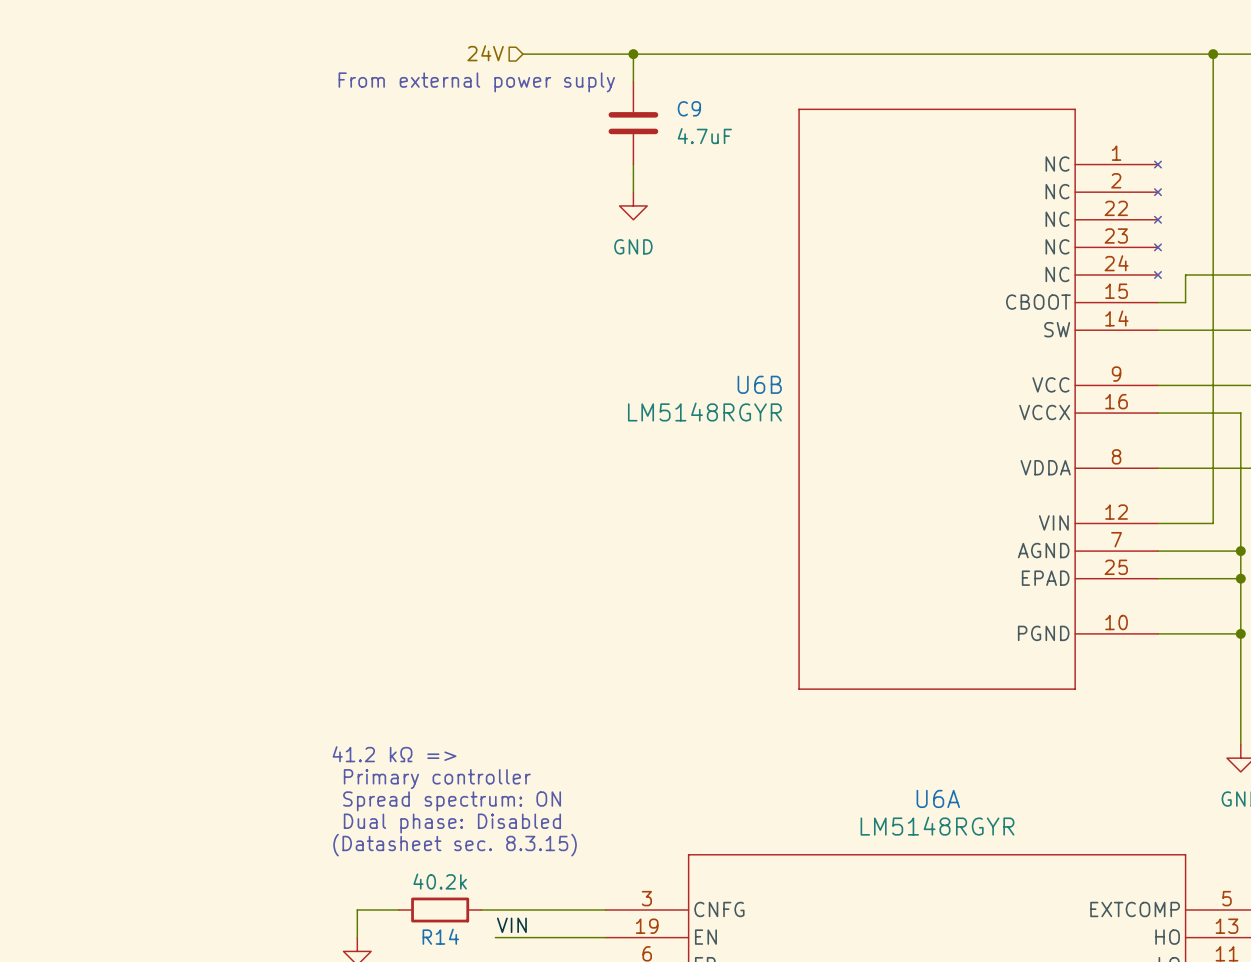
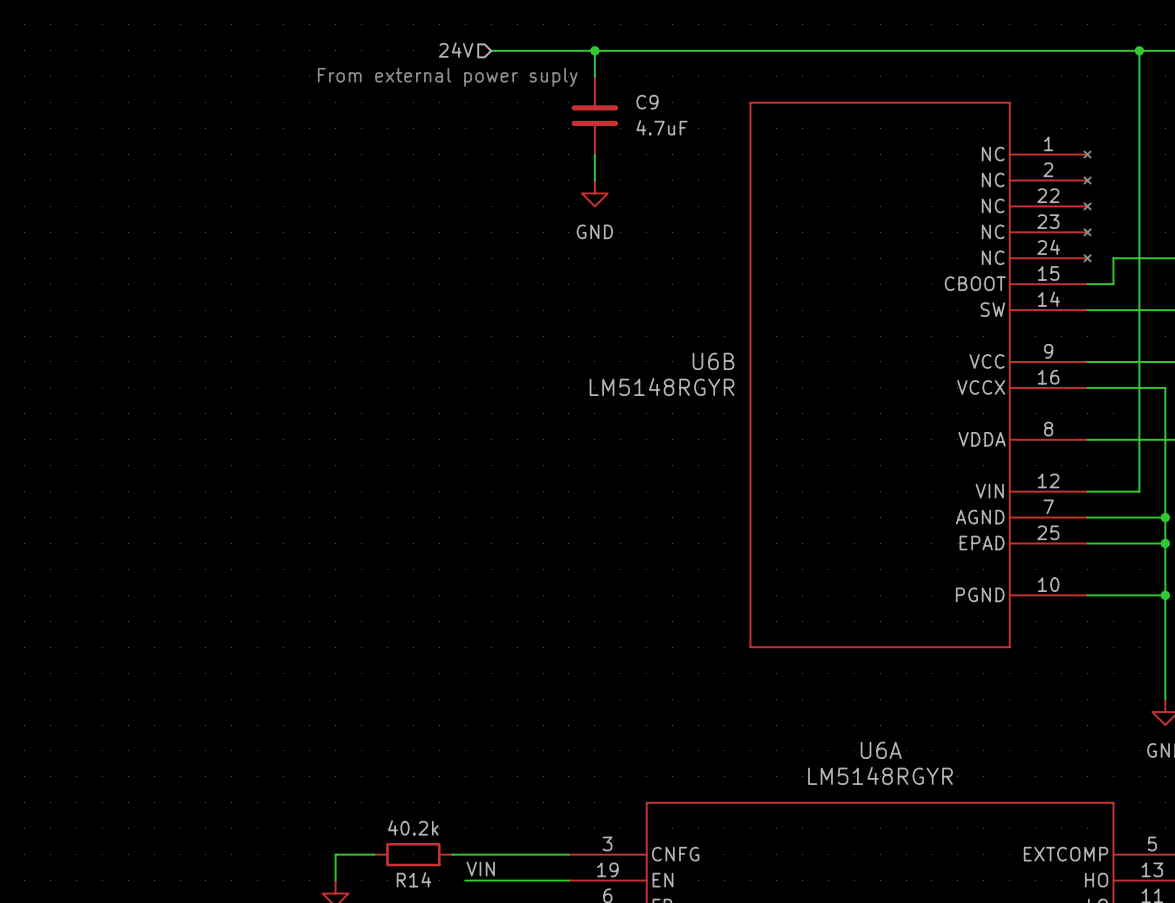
text: 41.2 kΩ => (394, 754) -> none
text: Primary controller (437, 779) -> none
text: Spread spectrum: ON (452, 801) -> none
text: Dual phase: Disabled (452, 823) -> none
text: (Datasheet sec. 8.3.15) (455, 845) -> none

